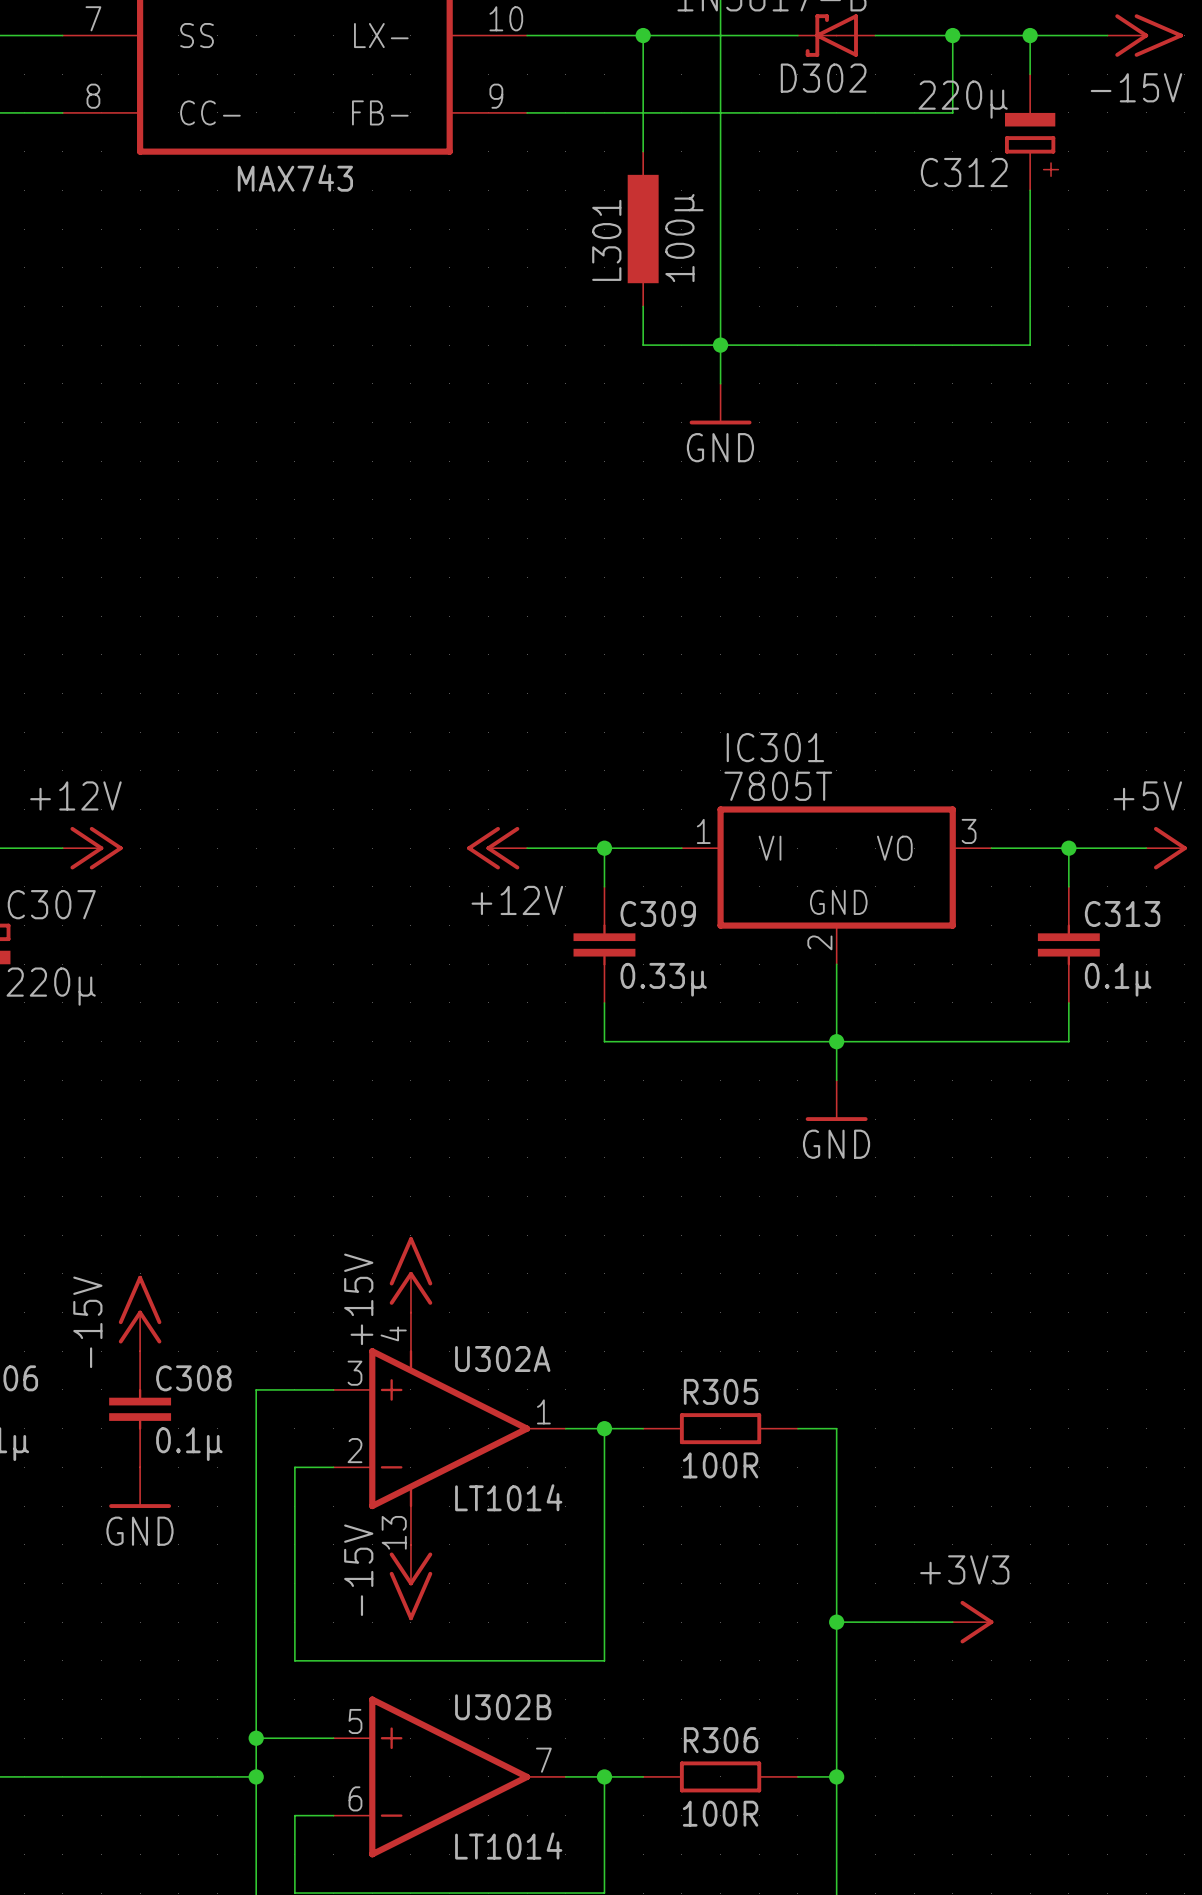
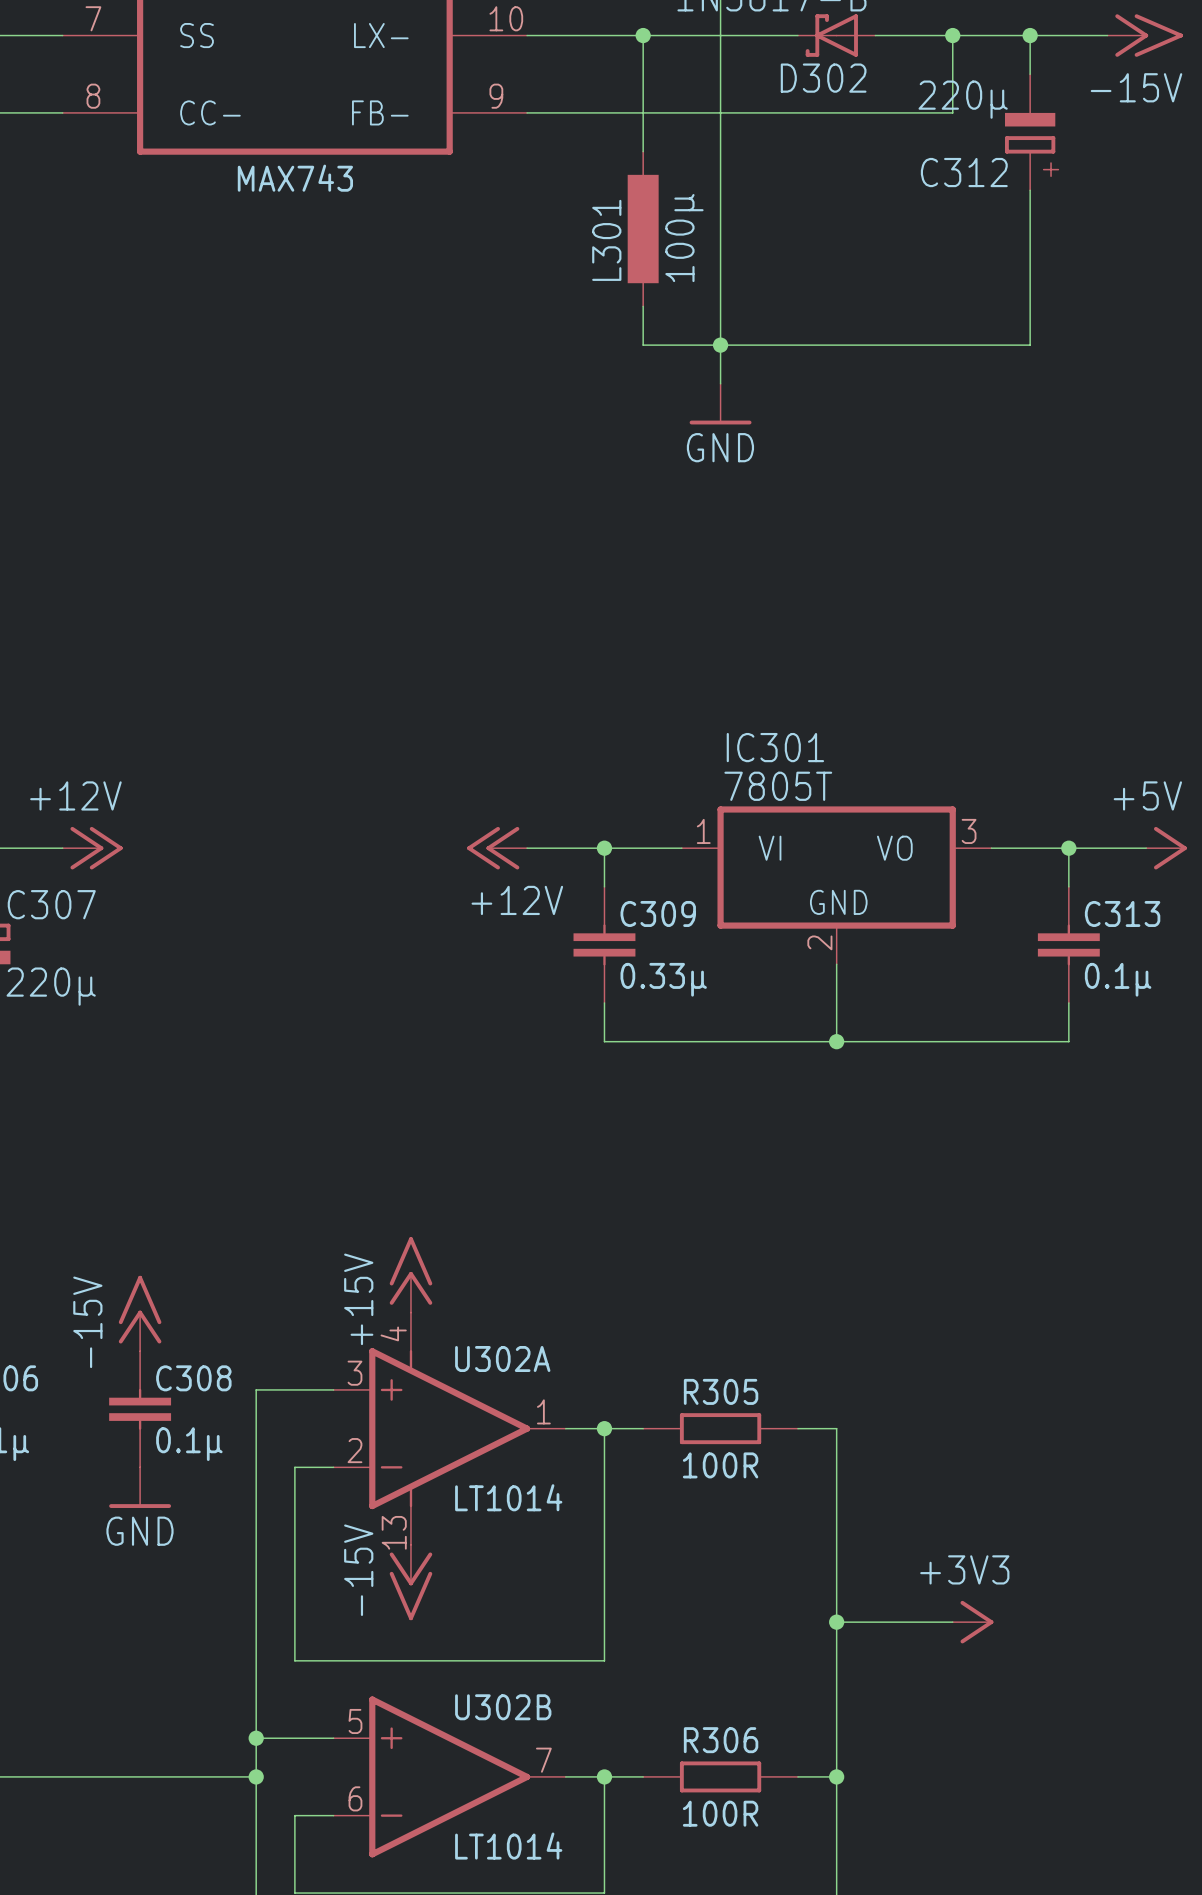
wire: (836, 1041) (836, 1080) -> none
power symbol: GND (836, 1100) -> none

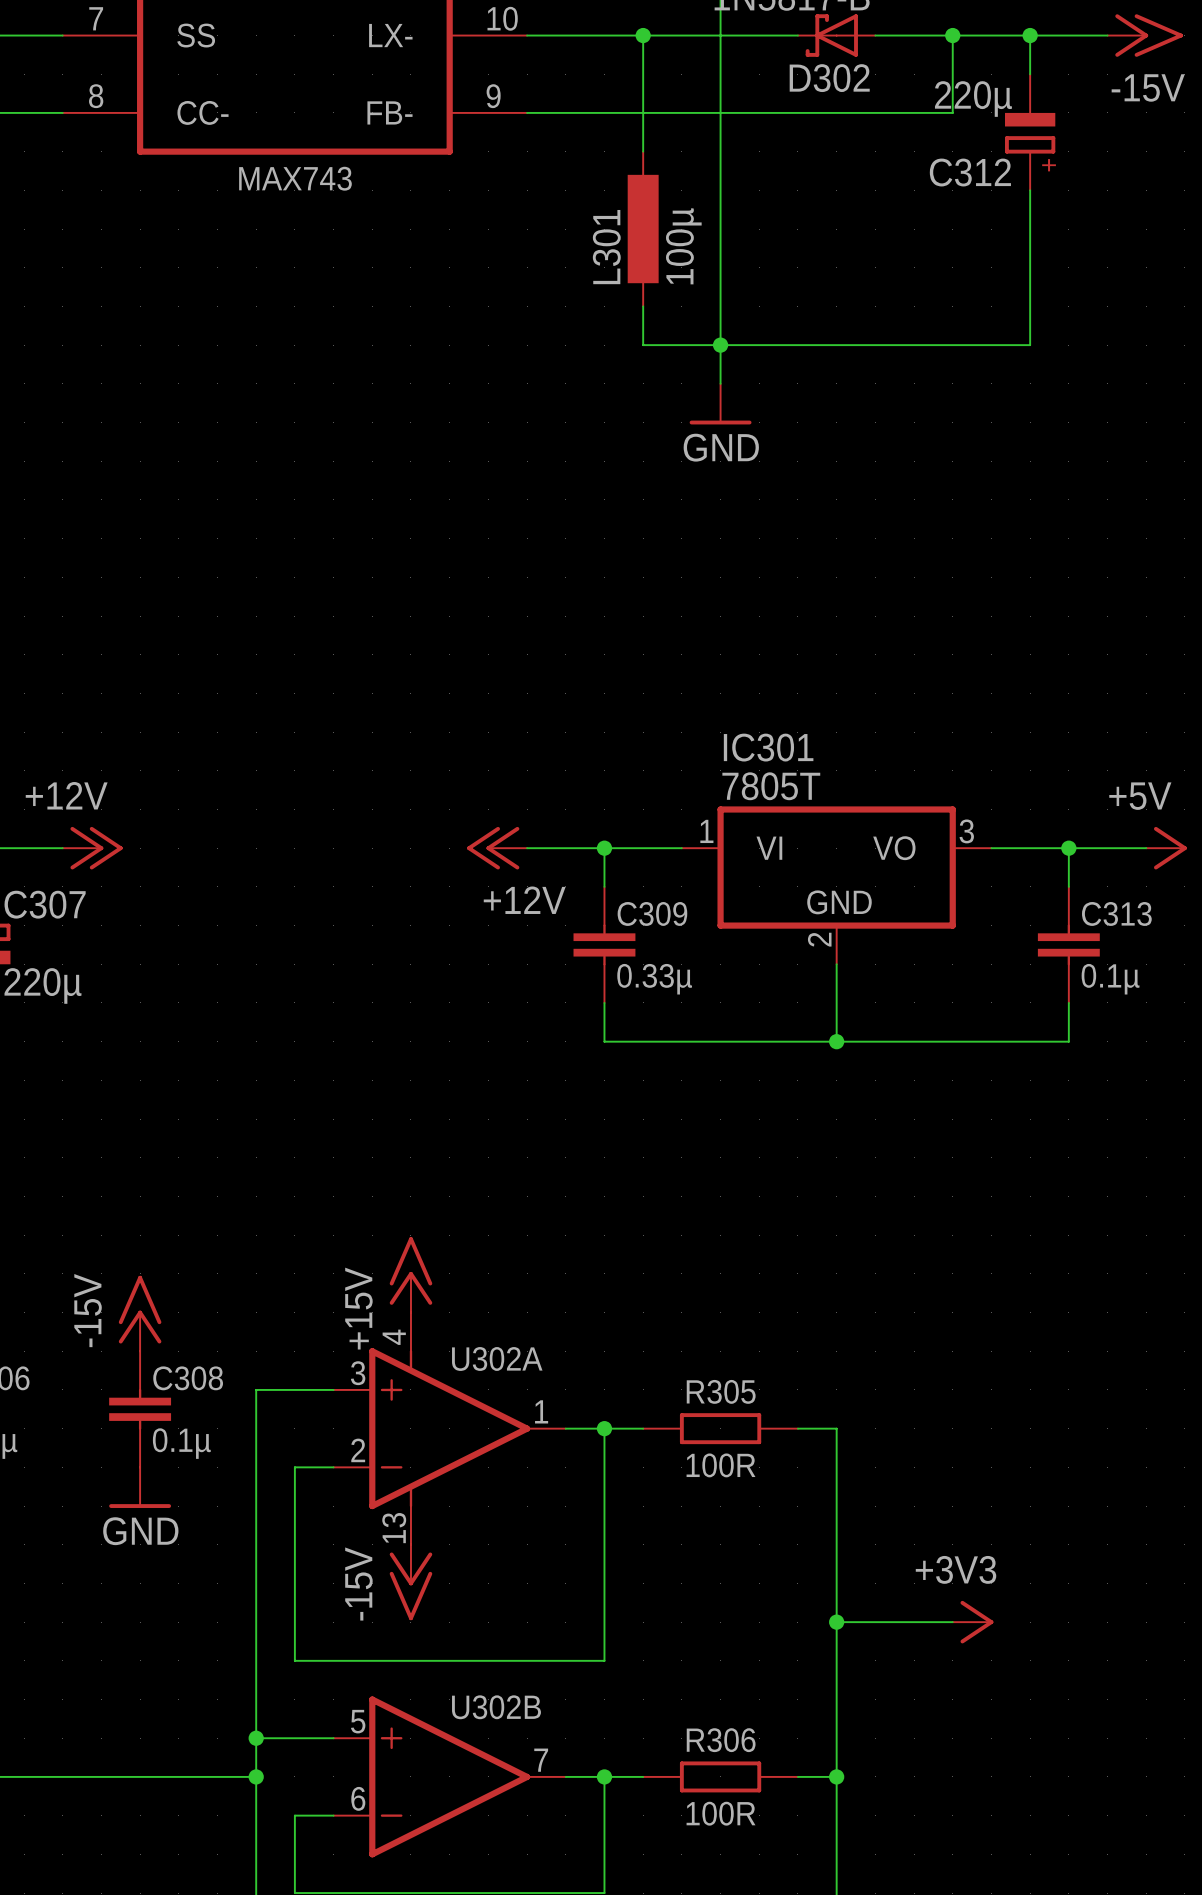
U302A value: LT1014 (508, 1497) -> none
U302B value: LT1014 (508, 1846) -> none

